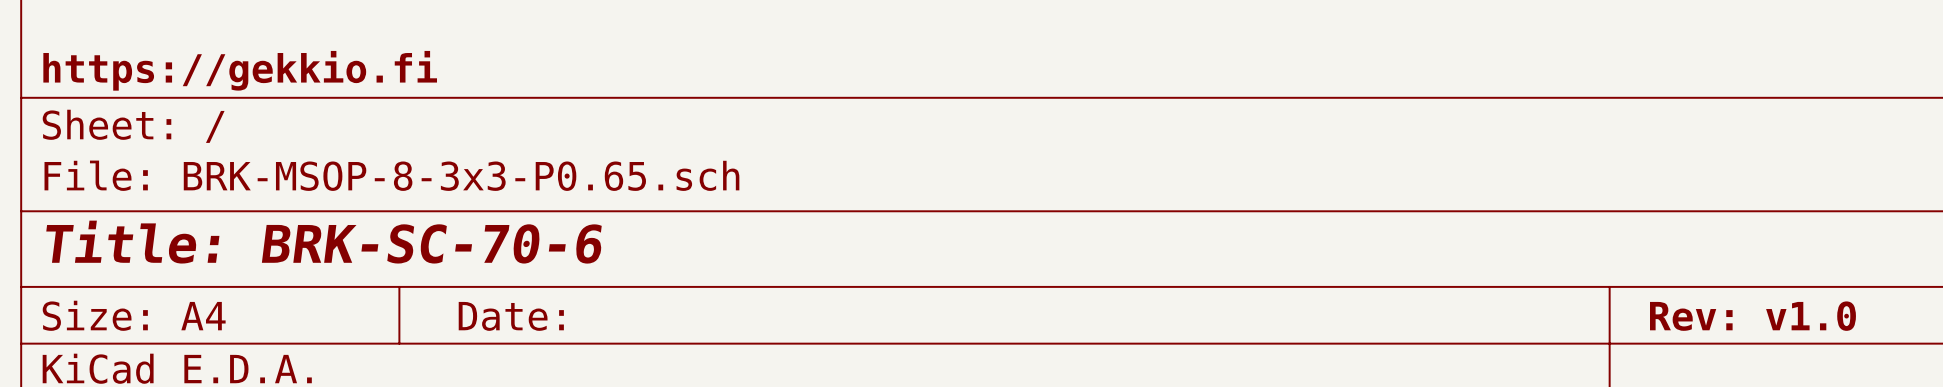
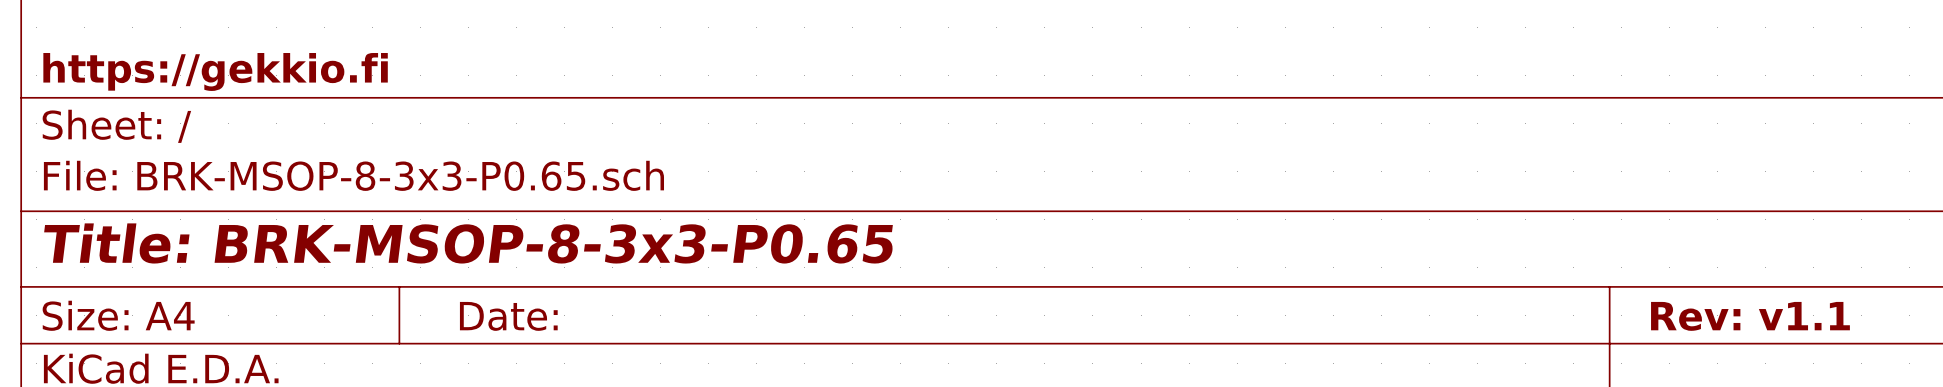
title block: Title: BRK-SC-70-6 (324, 242) -> Title: BRK-MSOP-8-3x3-P0.65 (468, 243)
title block: Rev: v1.0 (1752, 316) -> Rev: v1.1 (1750, 316)

